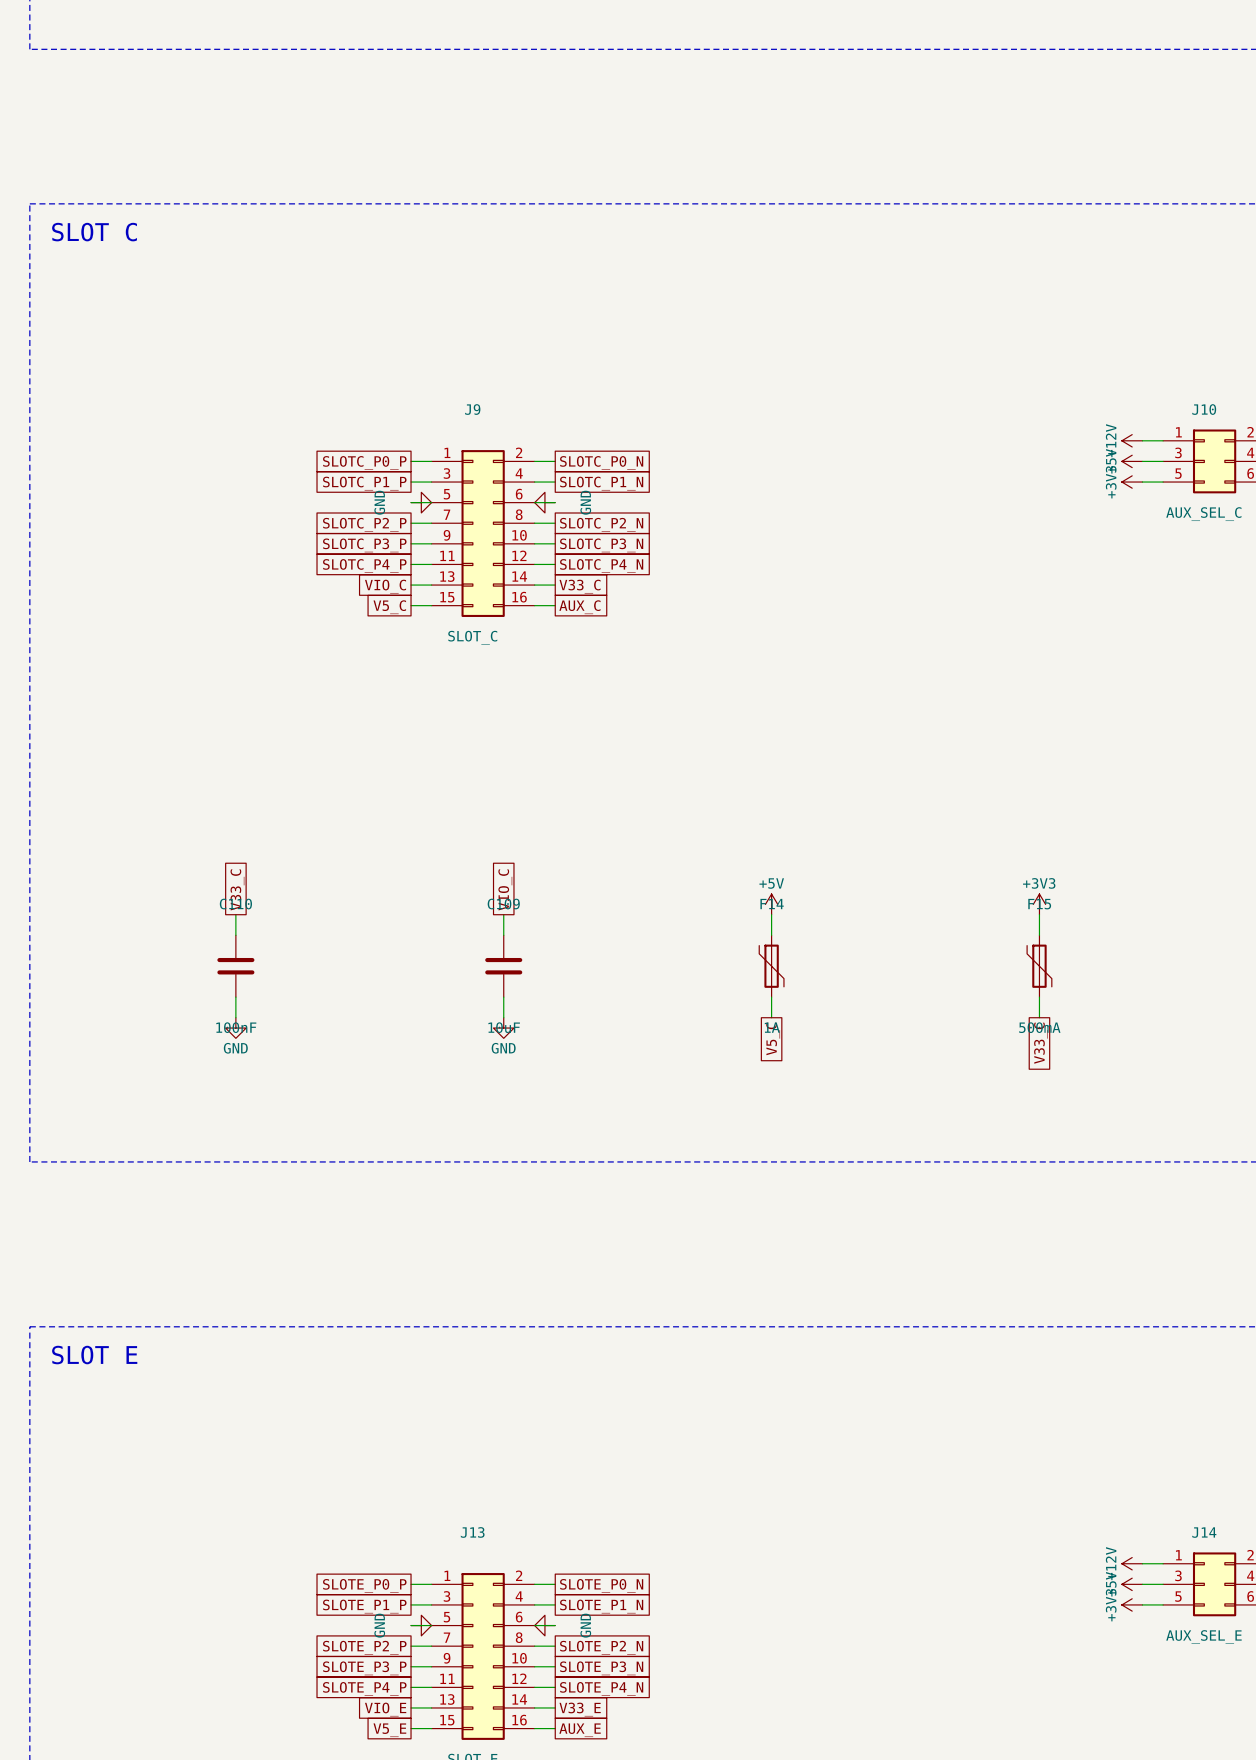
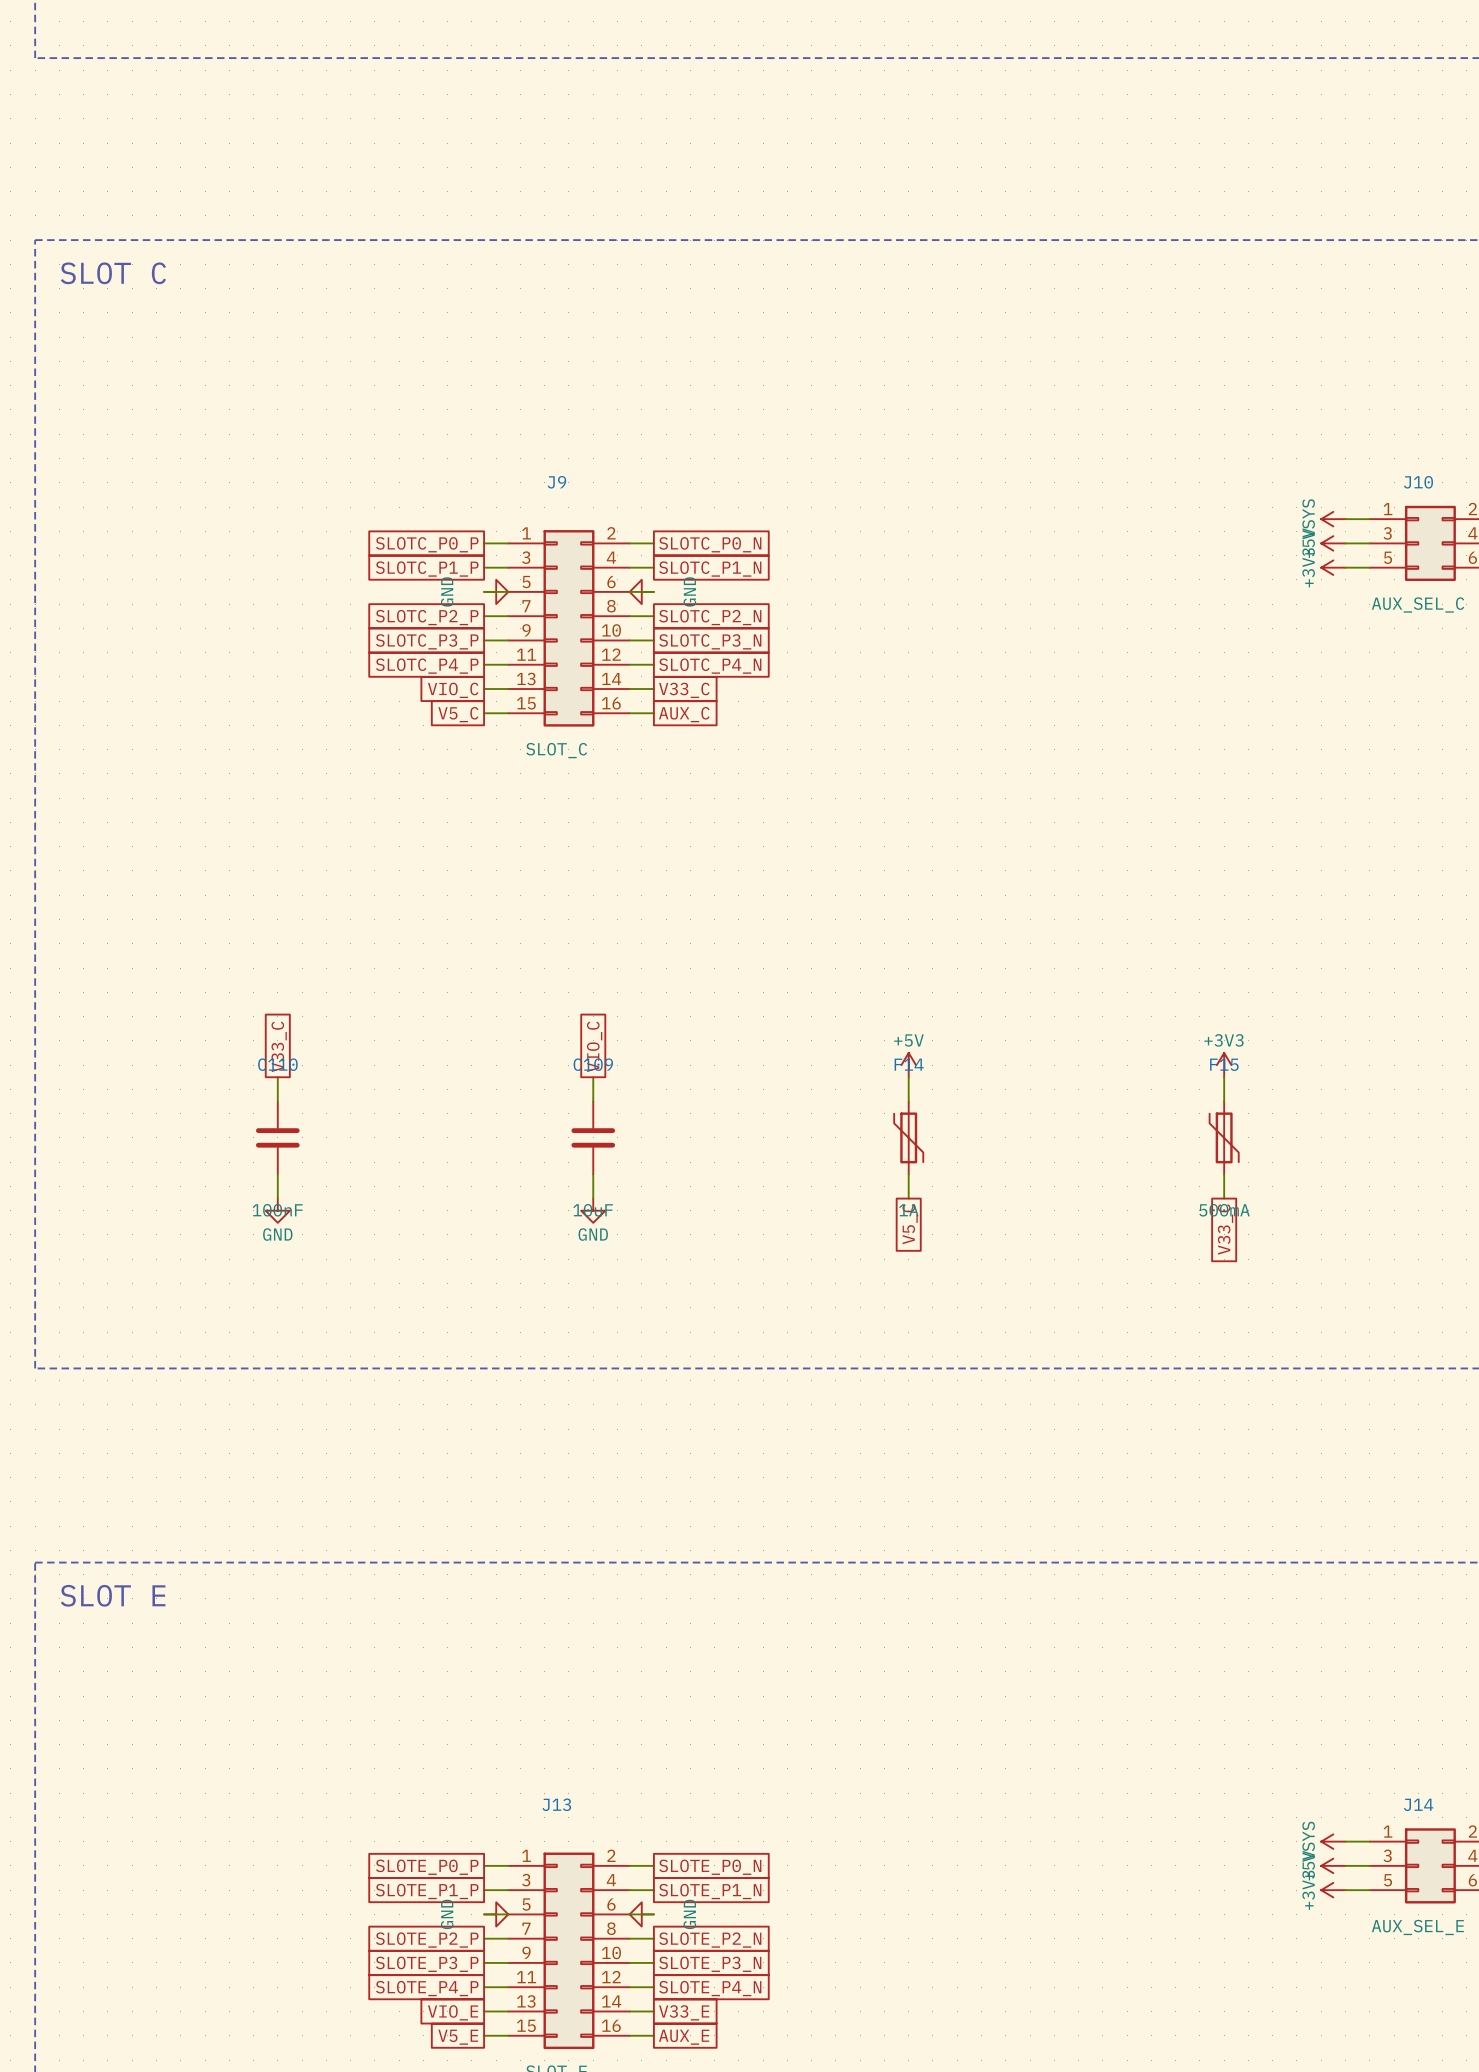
power symbol: +12V (1132, 440) -> VSYS (1333, 519)
power symbol: +12V (1132, 1563) -> VSYS (1333, 1841)

